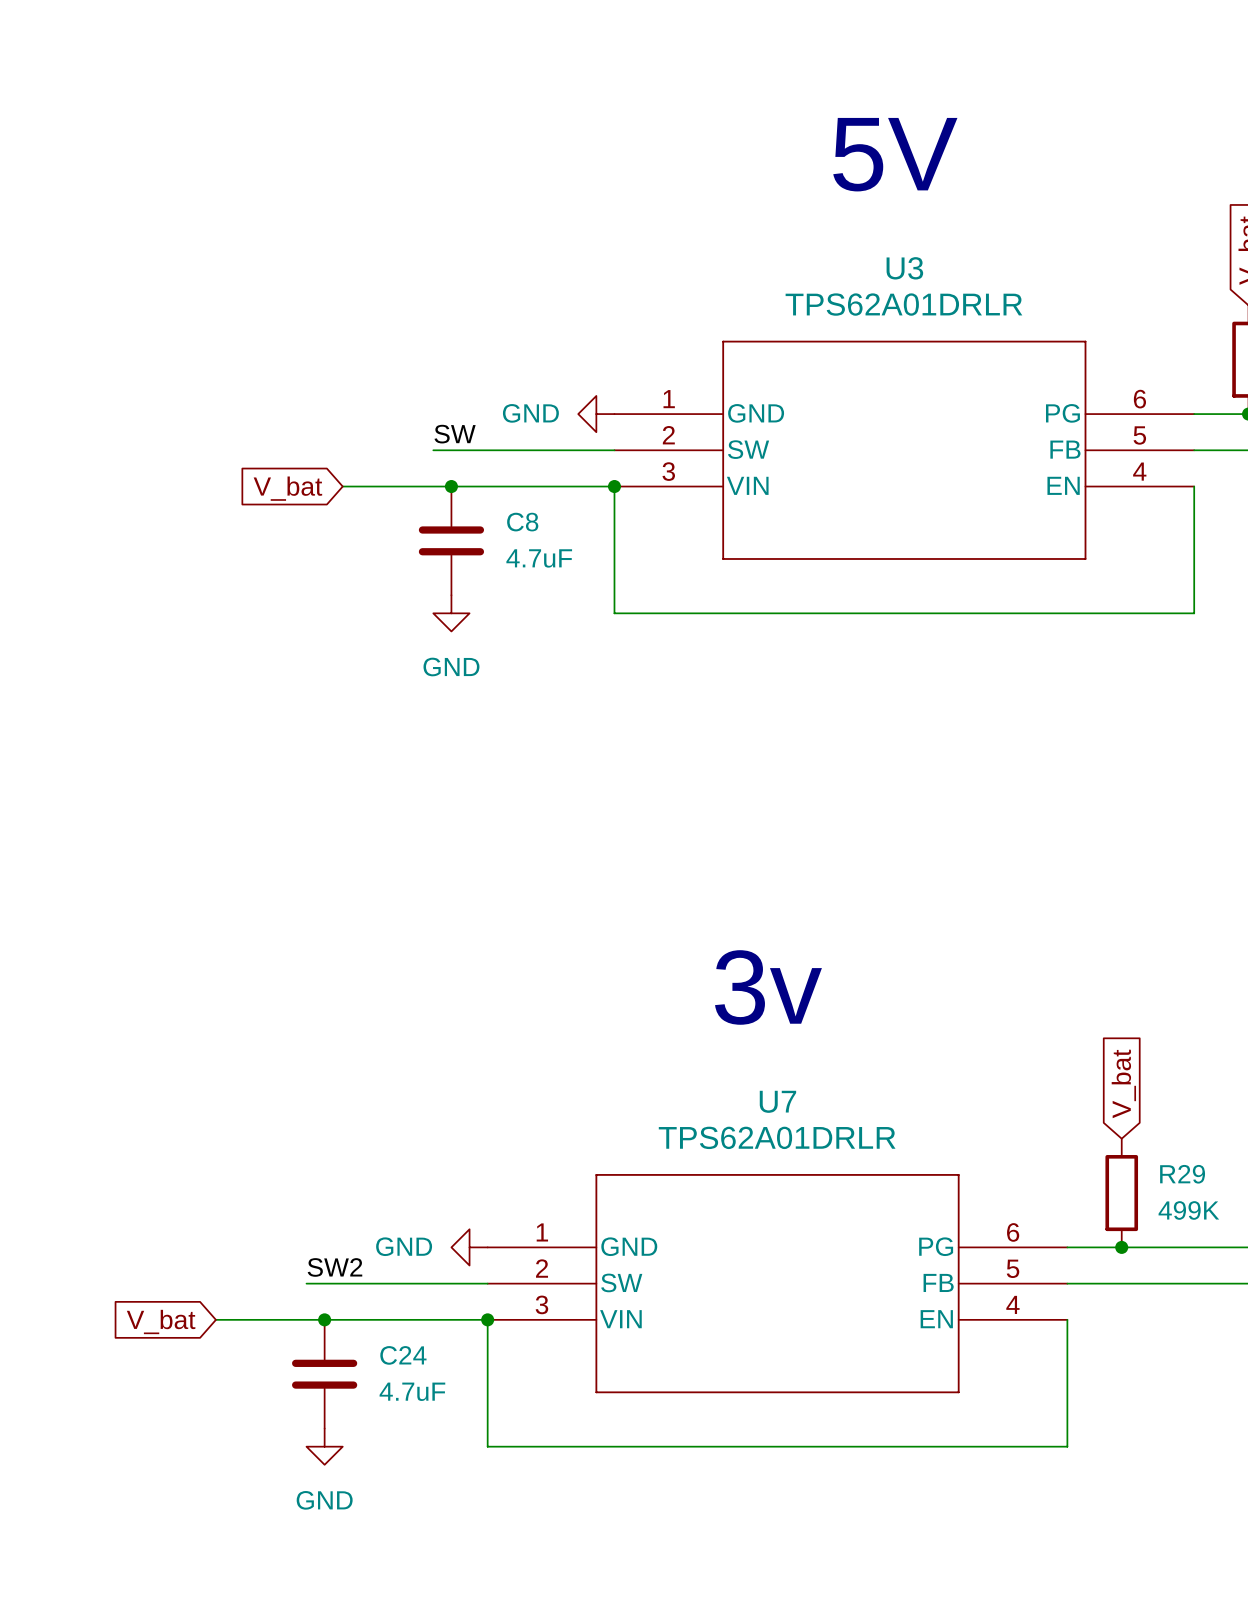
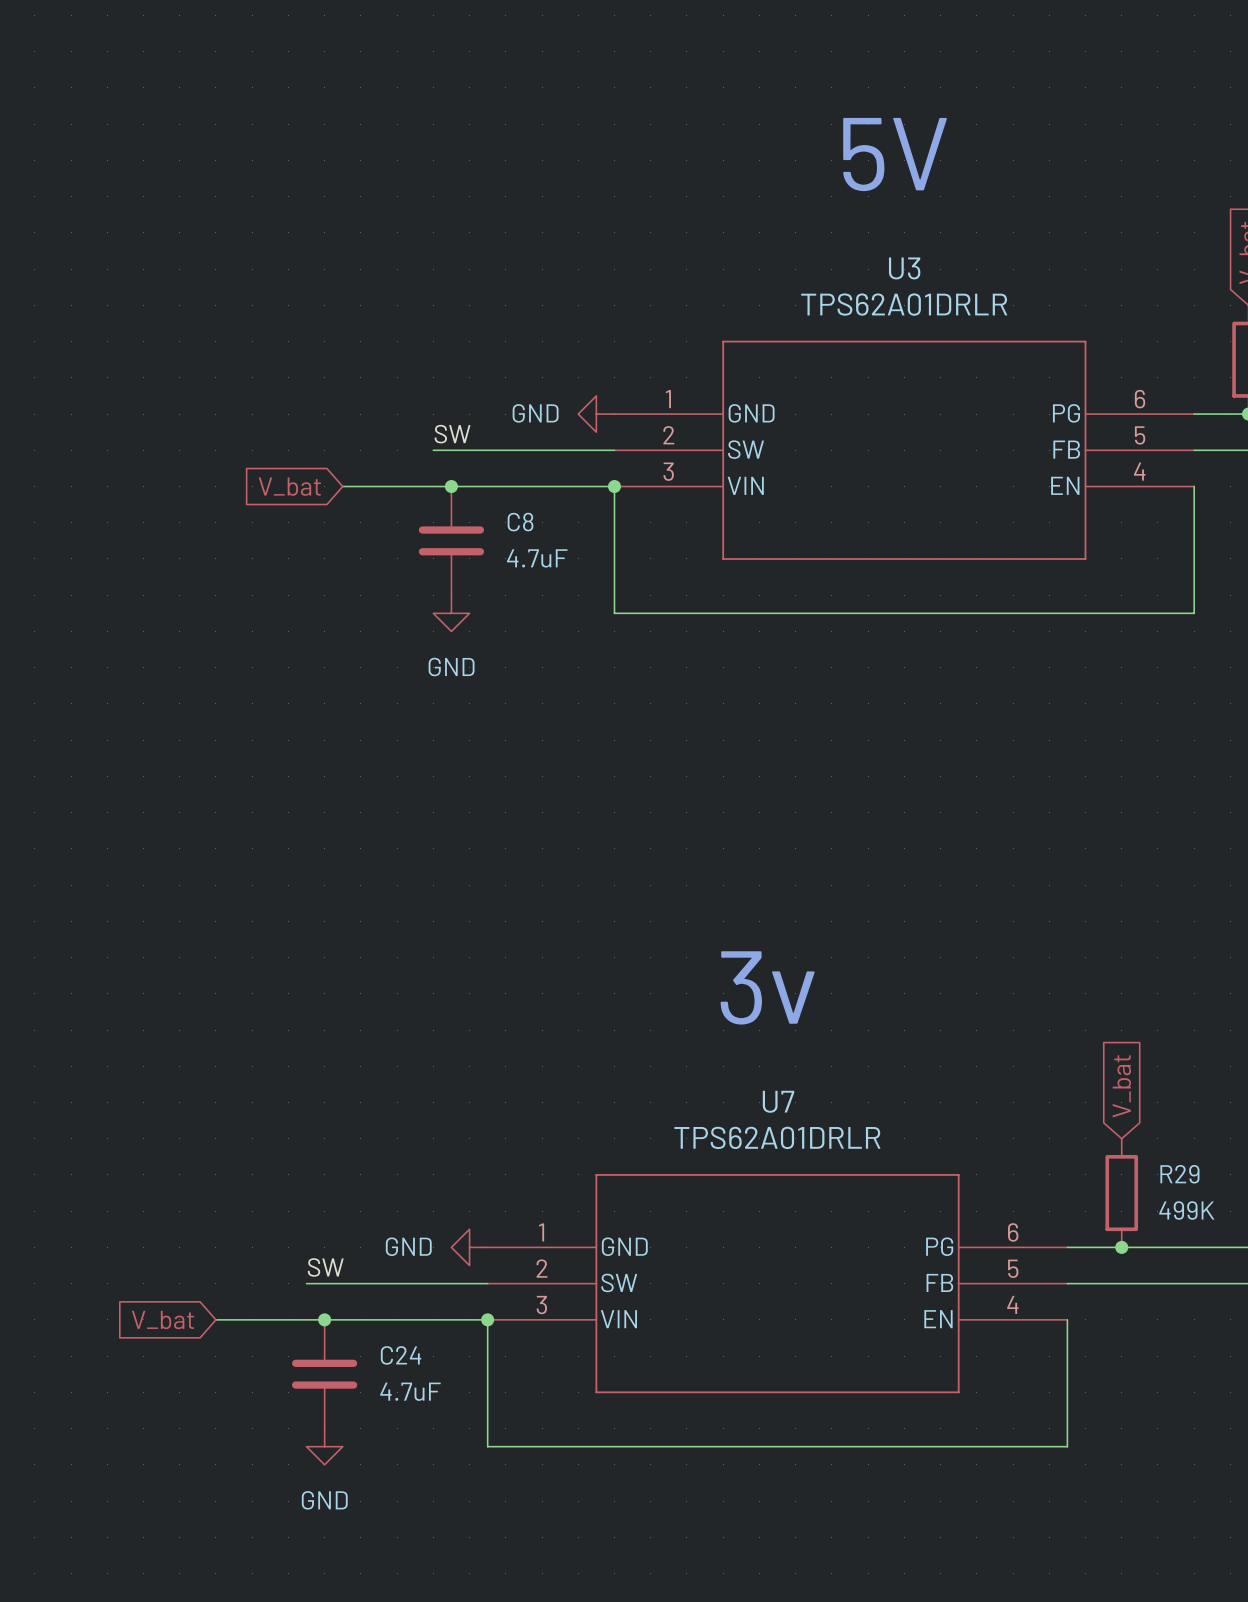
label: SW2 (334, 1267) -> SW (325, 1267)

